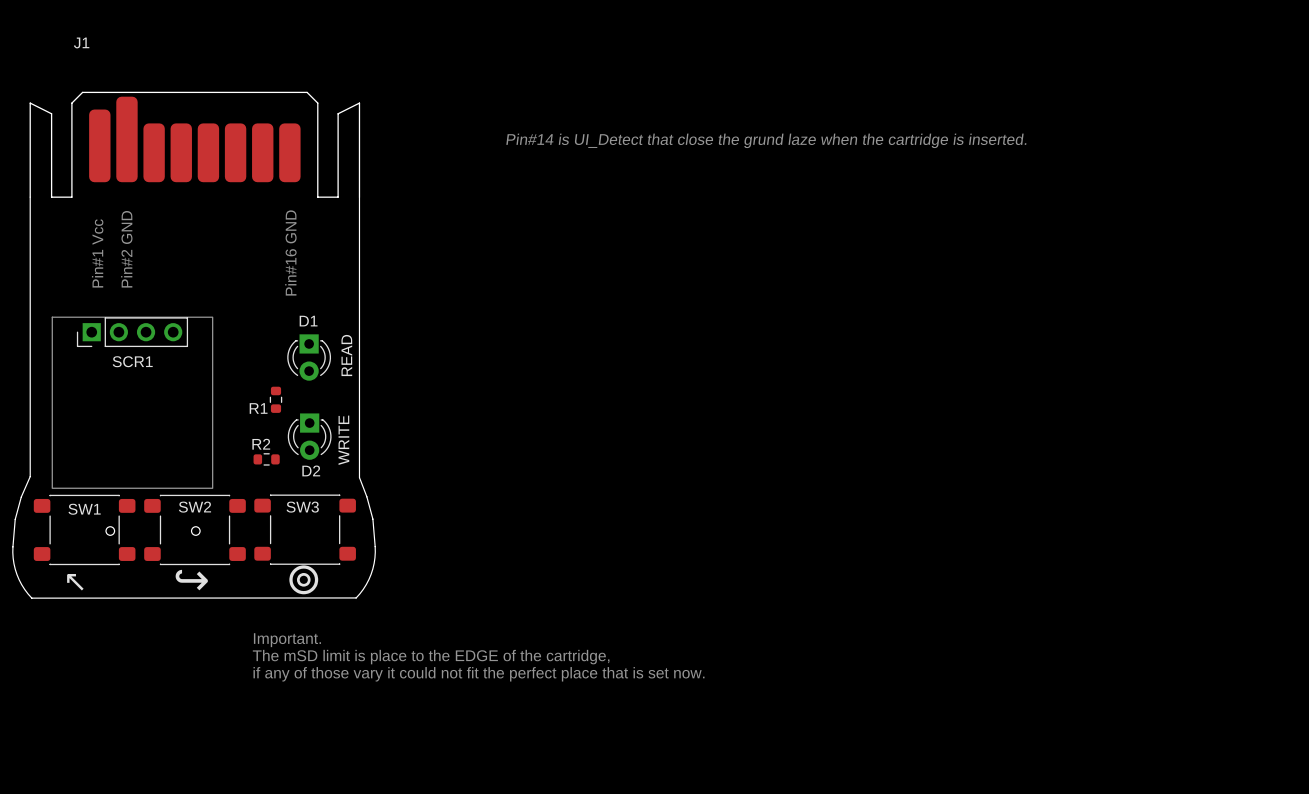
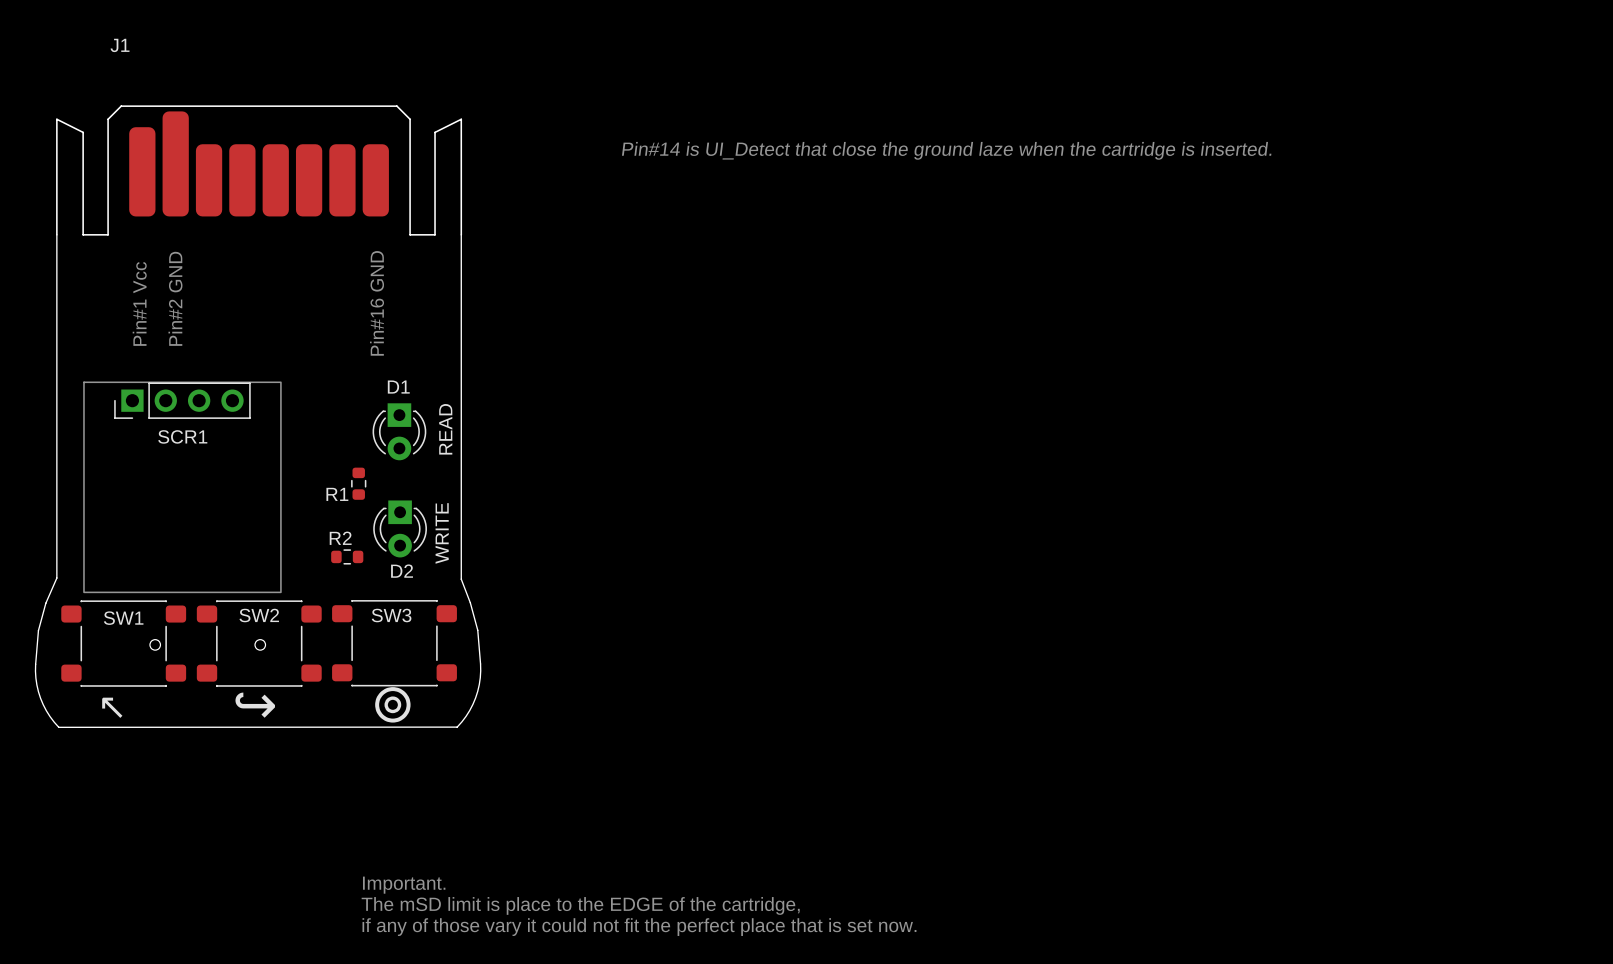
text: Pin#14 is UI_Detect that close the grund laze when the cartridge is inserted. (766, 140) -> Pin#14 is UI_Detect that close the ground laze when the cartridge is inserted. (946, 150)
text position: Important. (287, 640) -> Important. (404, 885)
text position: The mSD limit is place to the EDGE of the cartridge, (431, 657) -> The mSD limit is place to the EDGE of the cartridge, (580, 905)
text position: if any of those vary it could not fit the perfect place that is set now. (479, 674) -> if any of those vary it could not fit the perfect place that is set now. (639, 927)

